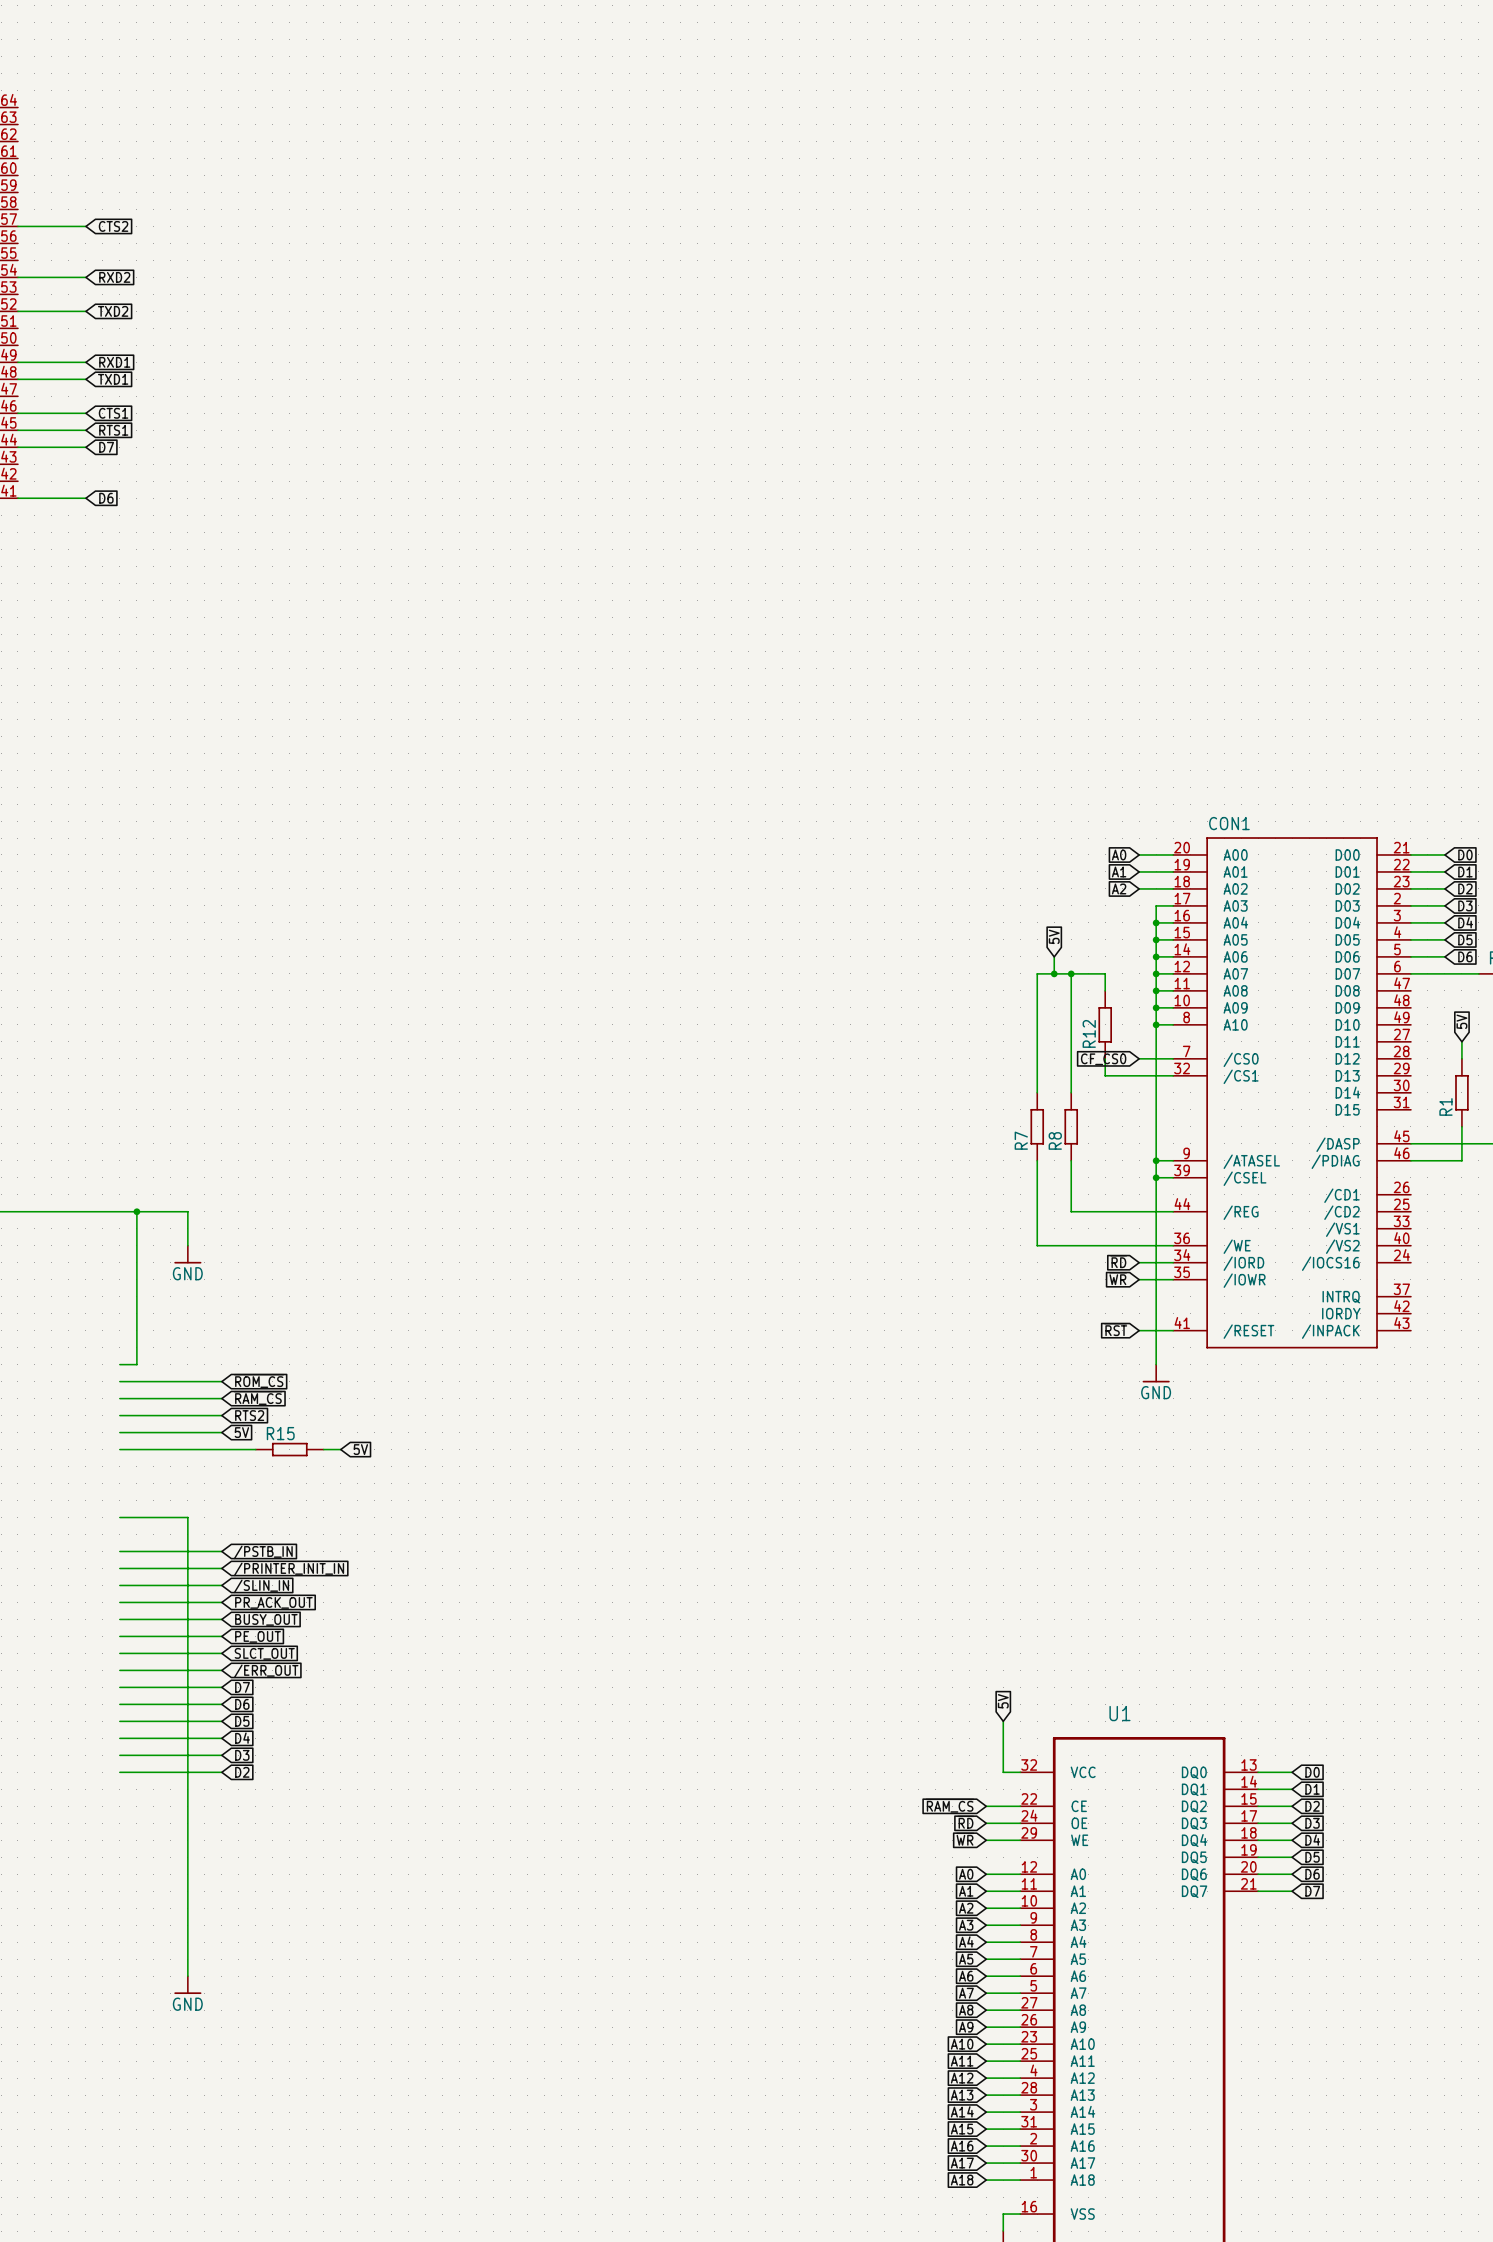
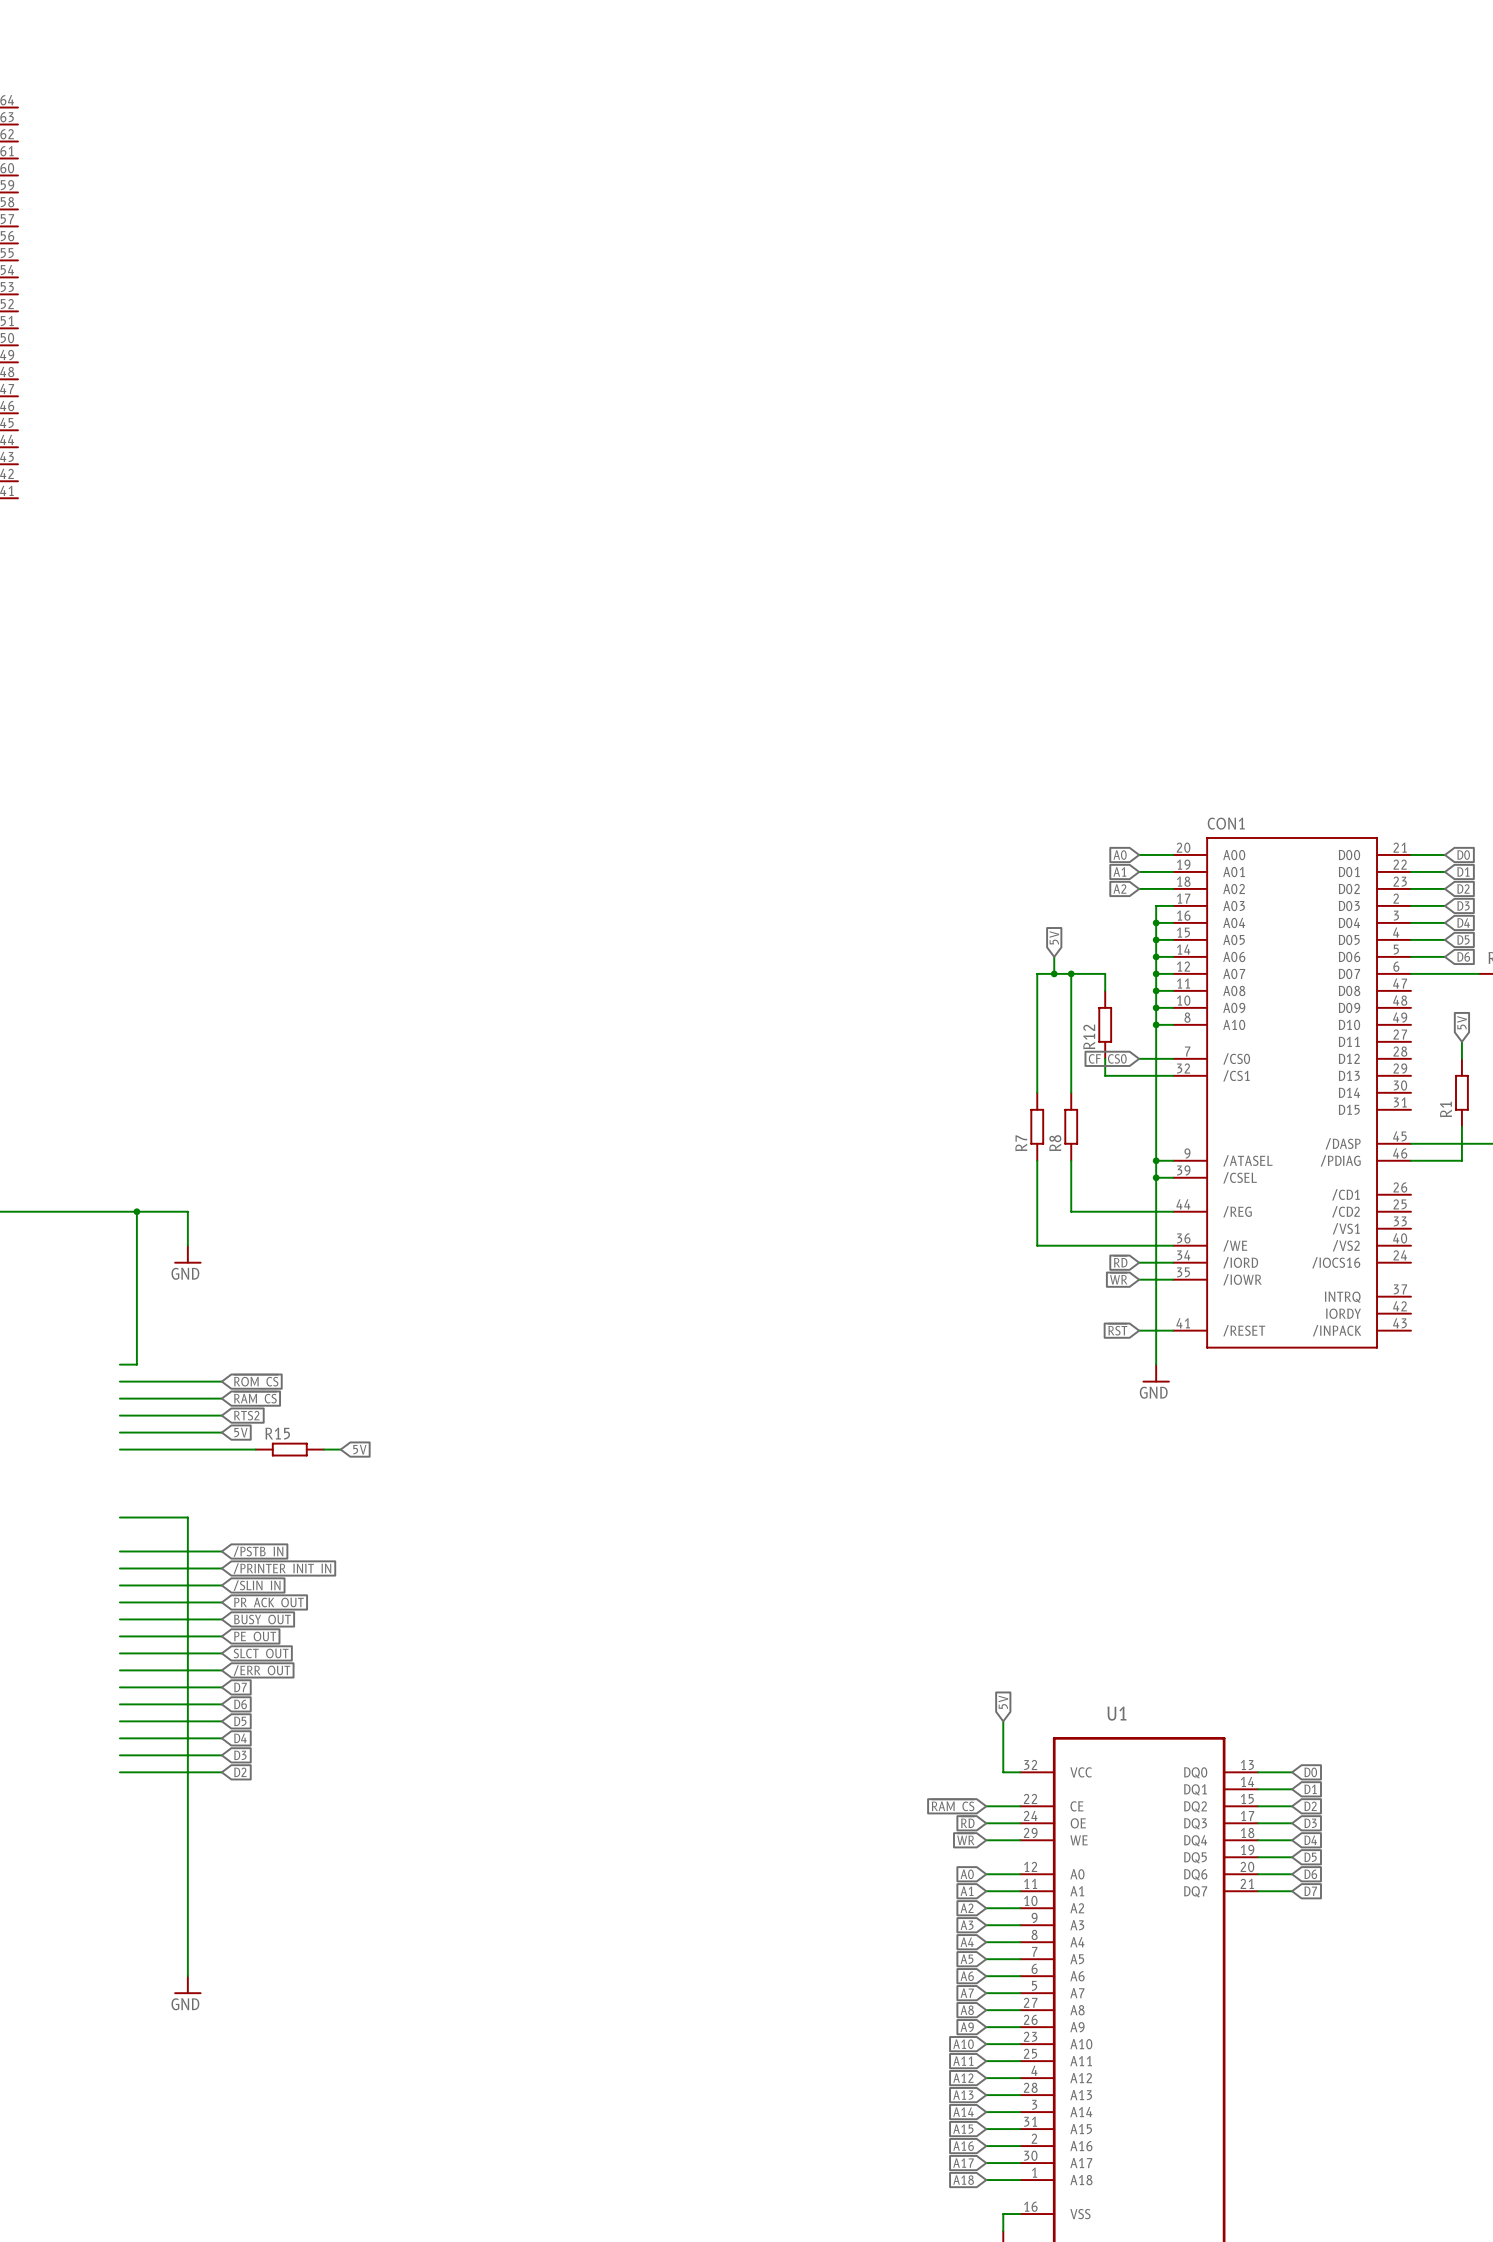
wire: (17, 226) (85, 226) -> none
global label: CTS2 (113, 226) -> none
wire: (17, 277) (85, 277) -> none
global label: RXD2 (114, 277) -> none
wire: (17, 311) (85, 311) -> none
global label: TXD2 (113, 311) -> none
wire: (17, 362) (85, 362) -> none
global label: RXD1 (114, 362) -> none
wire: (17, 379) (85, 379) -> none
global label: TXD1 (113, 379) -> none
wire: (17, 413) (85, 413) -> none
global label: CTS1 (113, 413) -> none
wire: (17, 430) (85, 430) -> none
global label: RTS1 (113, 430) -> none
wire: (17, 447) (85, 447) -> none
global label: D7 (106, 447) -> none
wire: (17, 498) (85, 498) -> none
global label: D6 (106, 498) -> none

